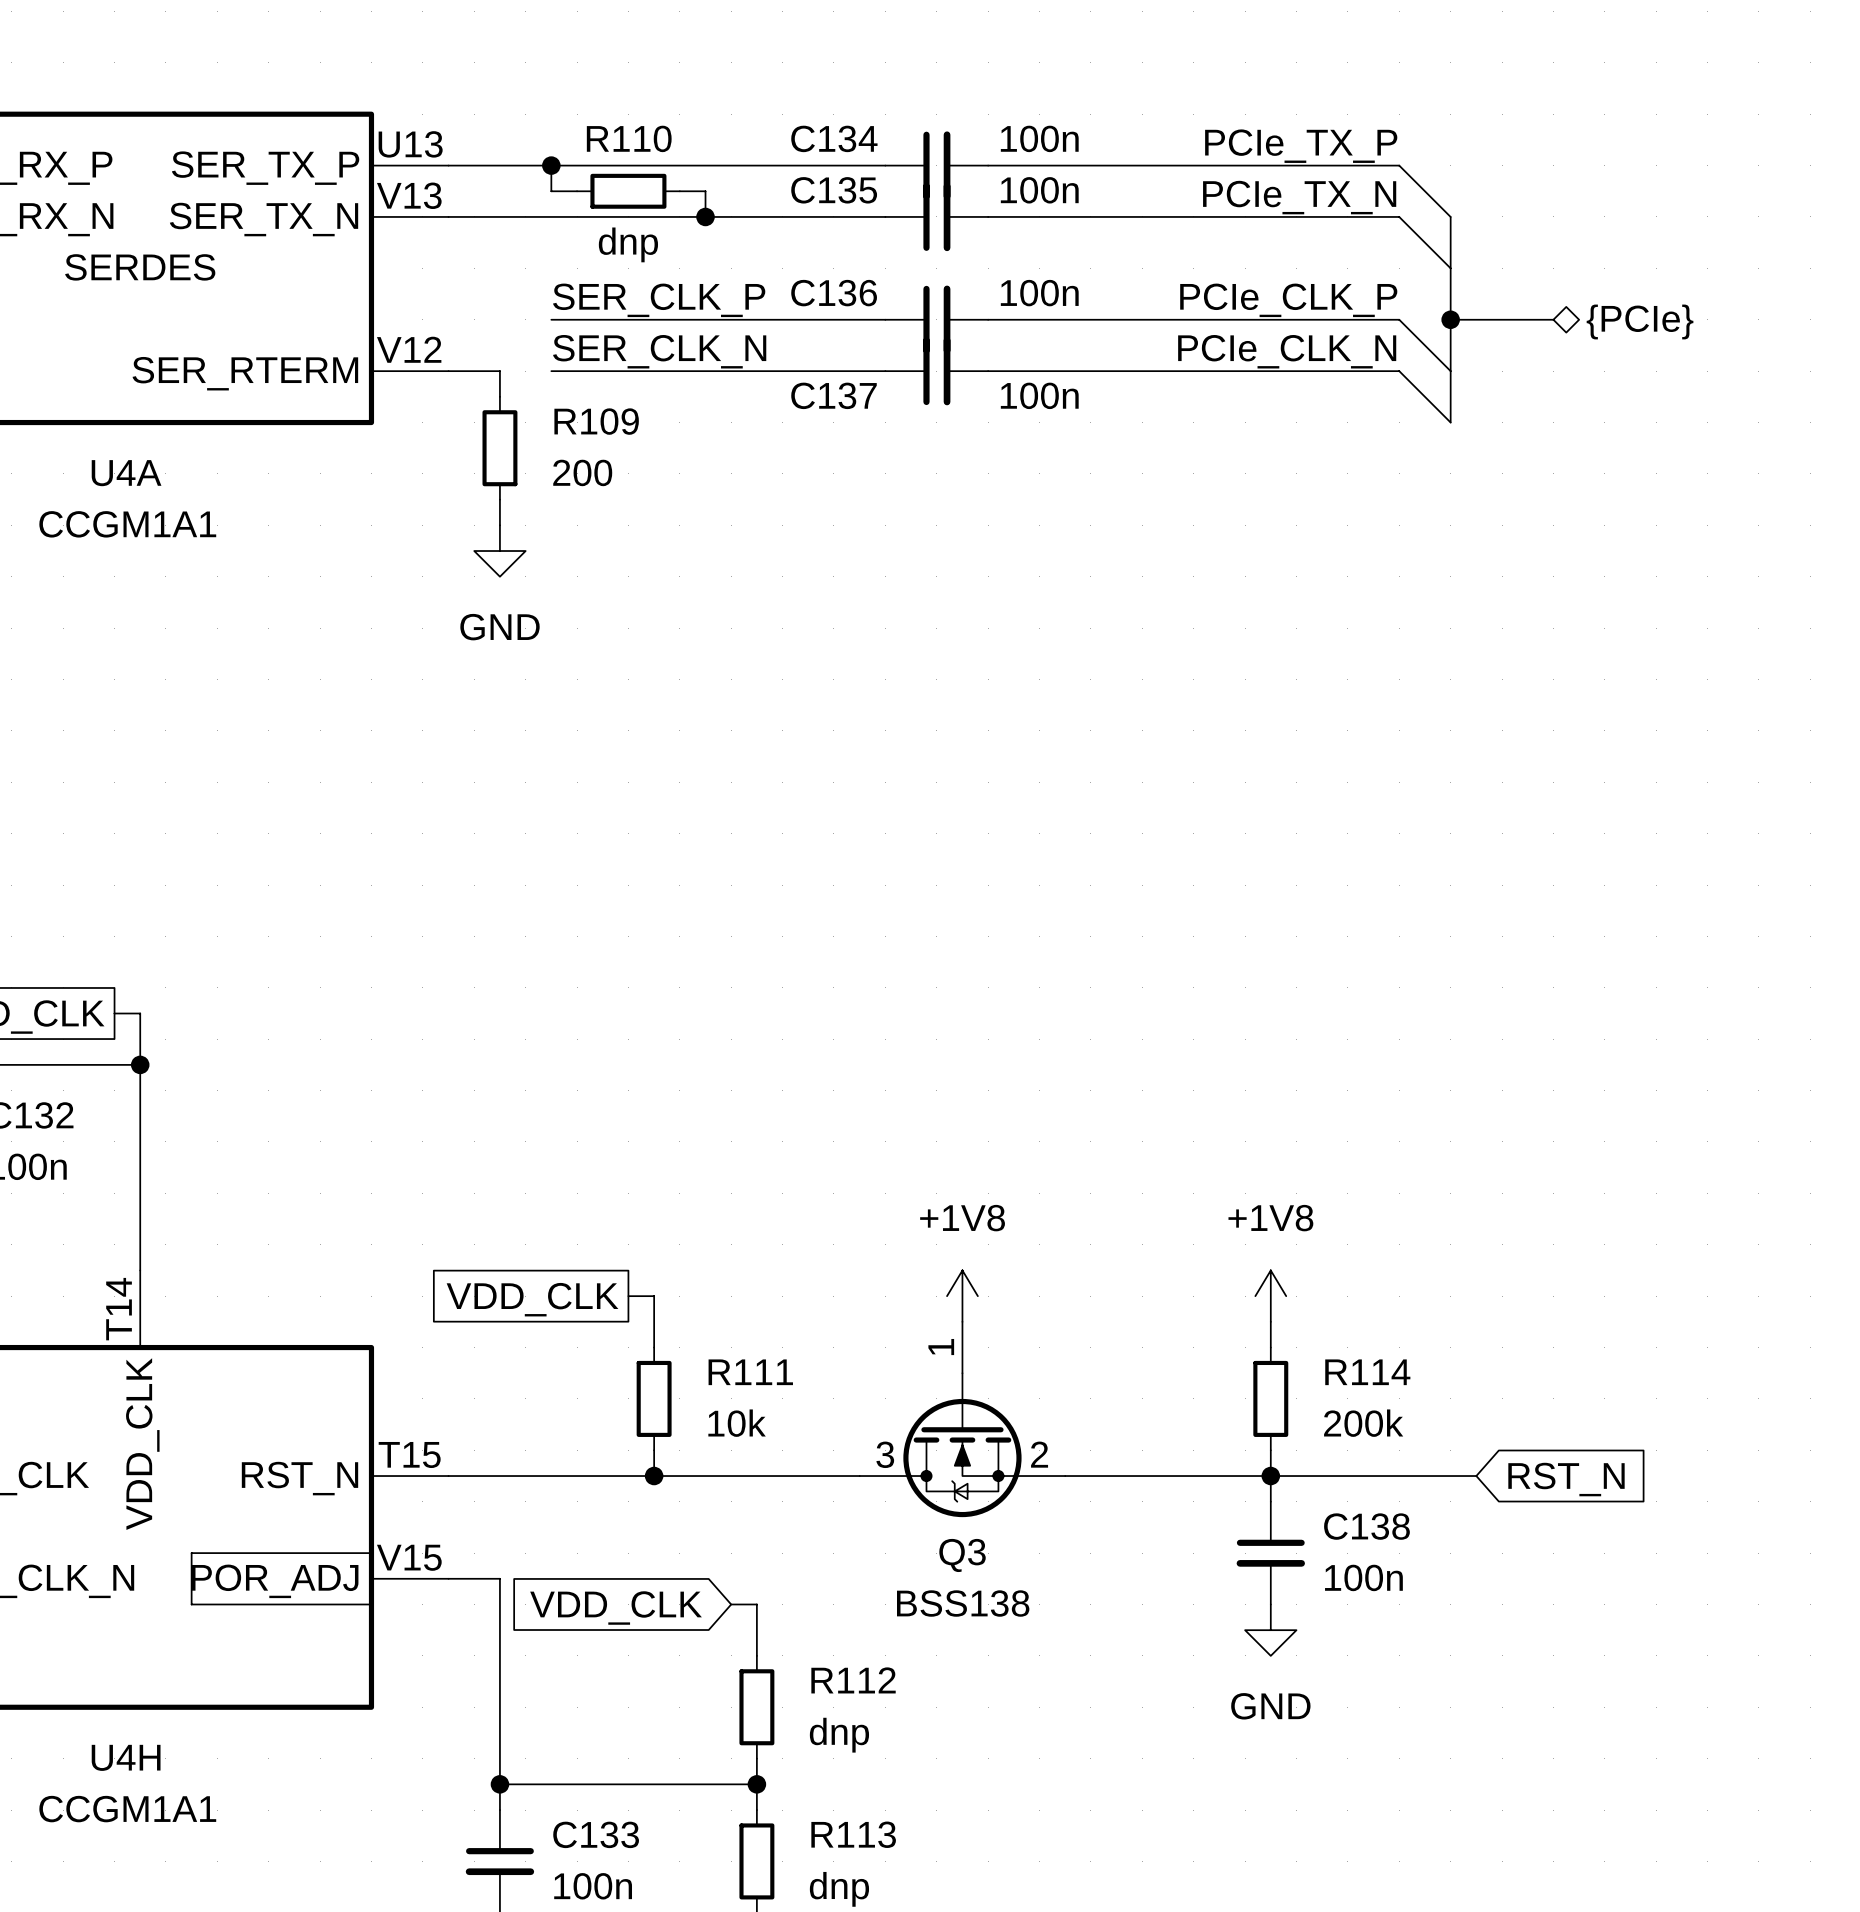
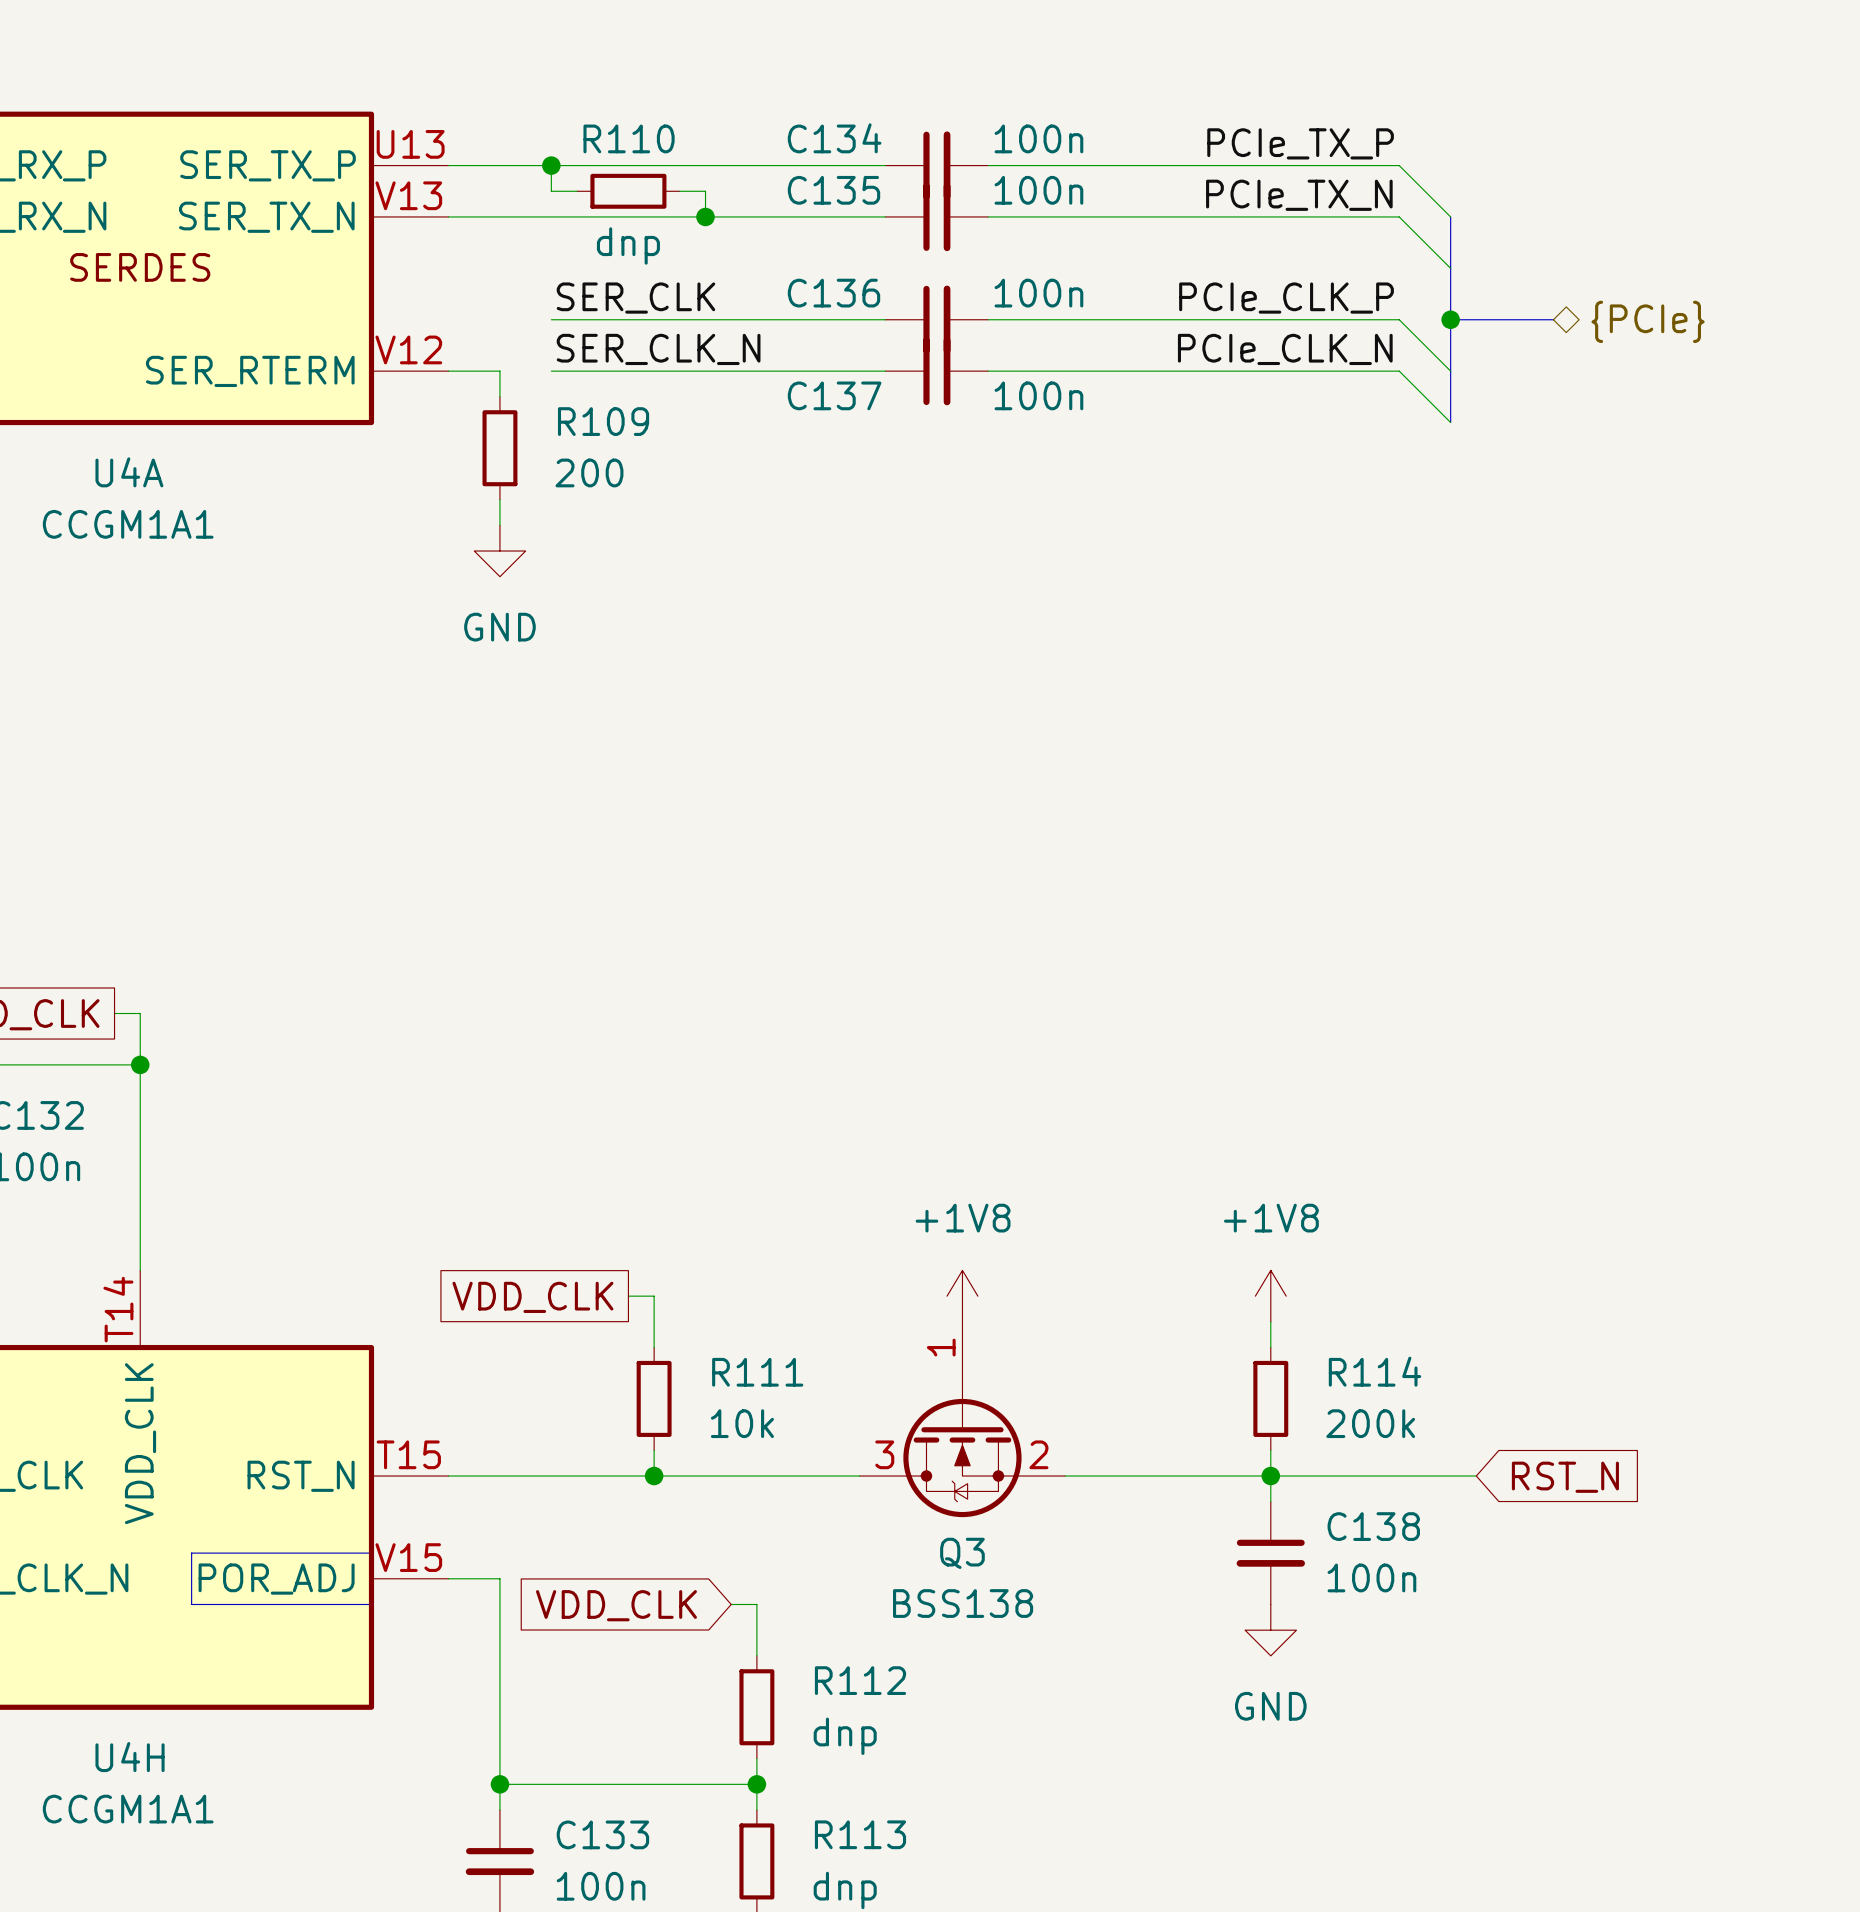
label: SER_CLK_P (659, 300) -> SER_CLK (635, 298)

